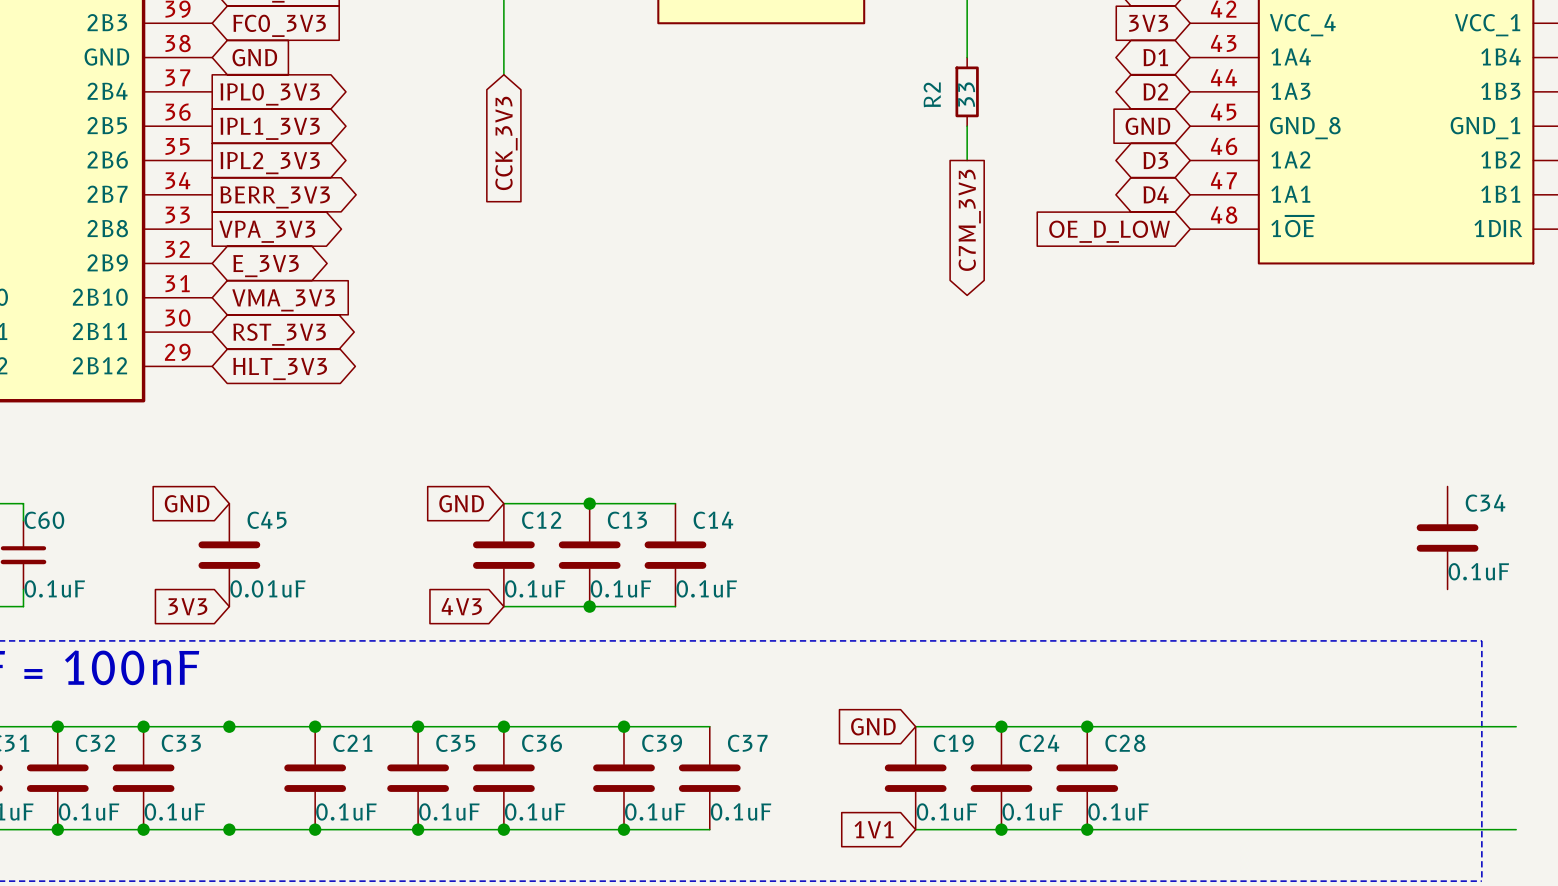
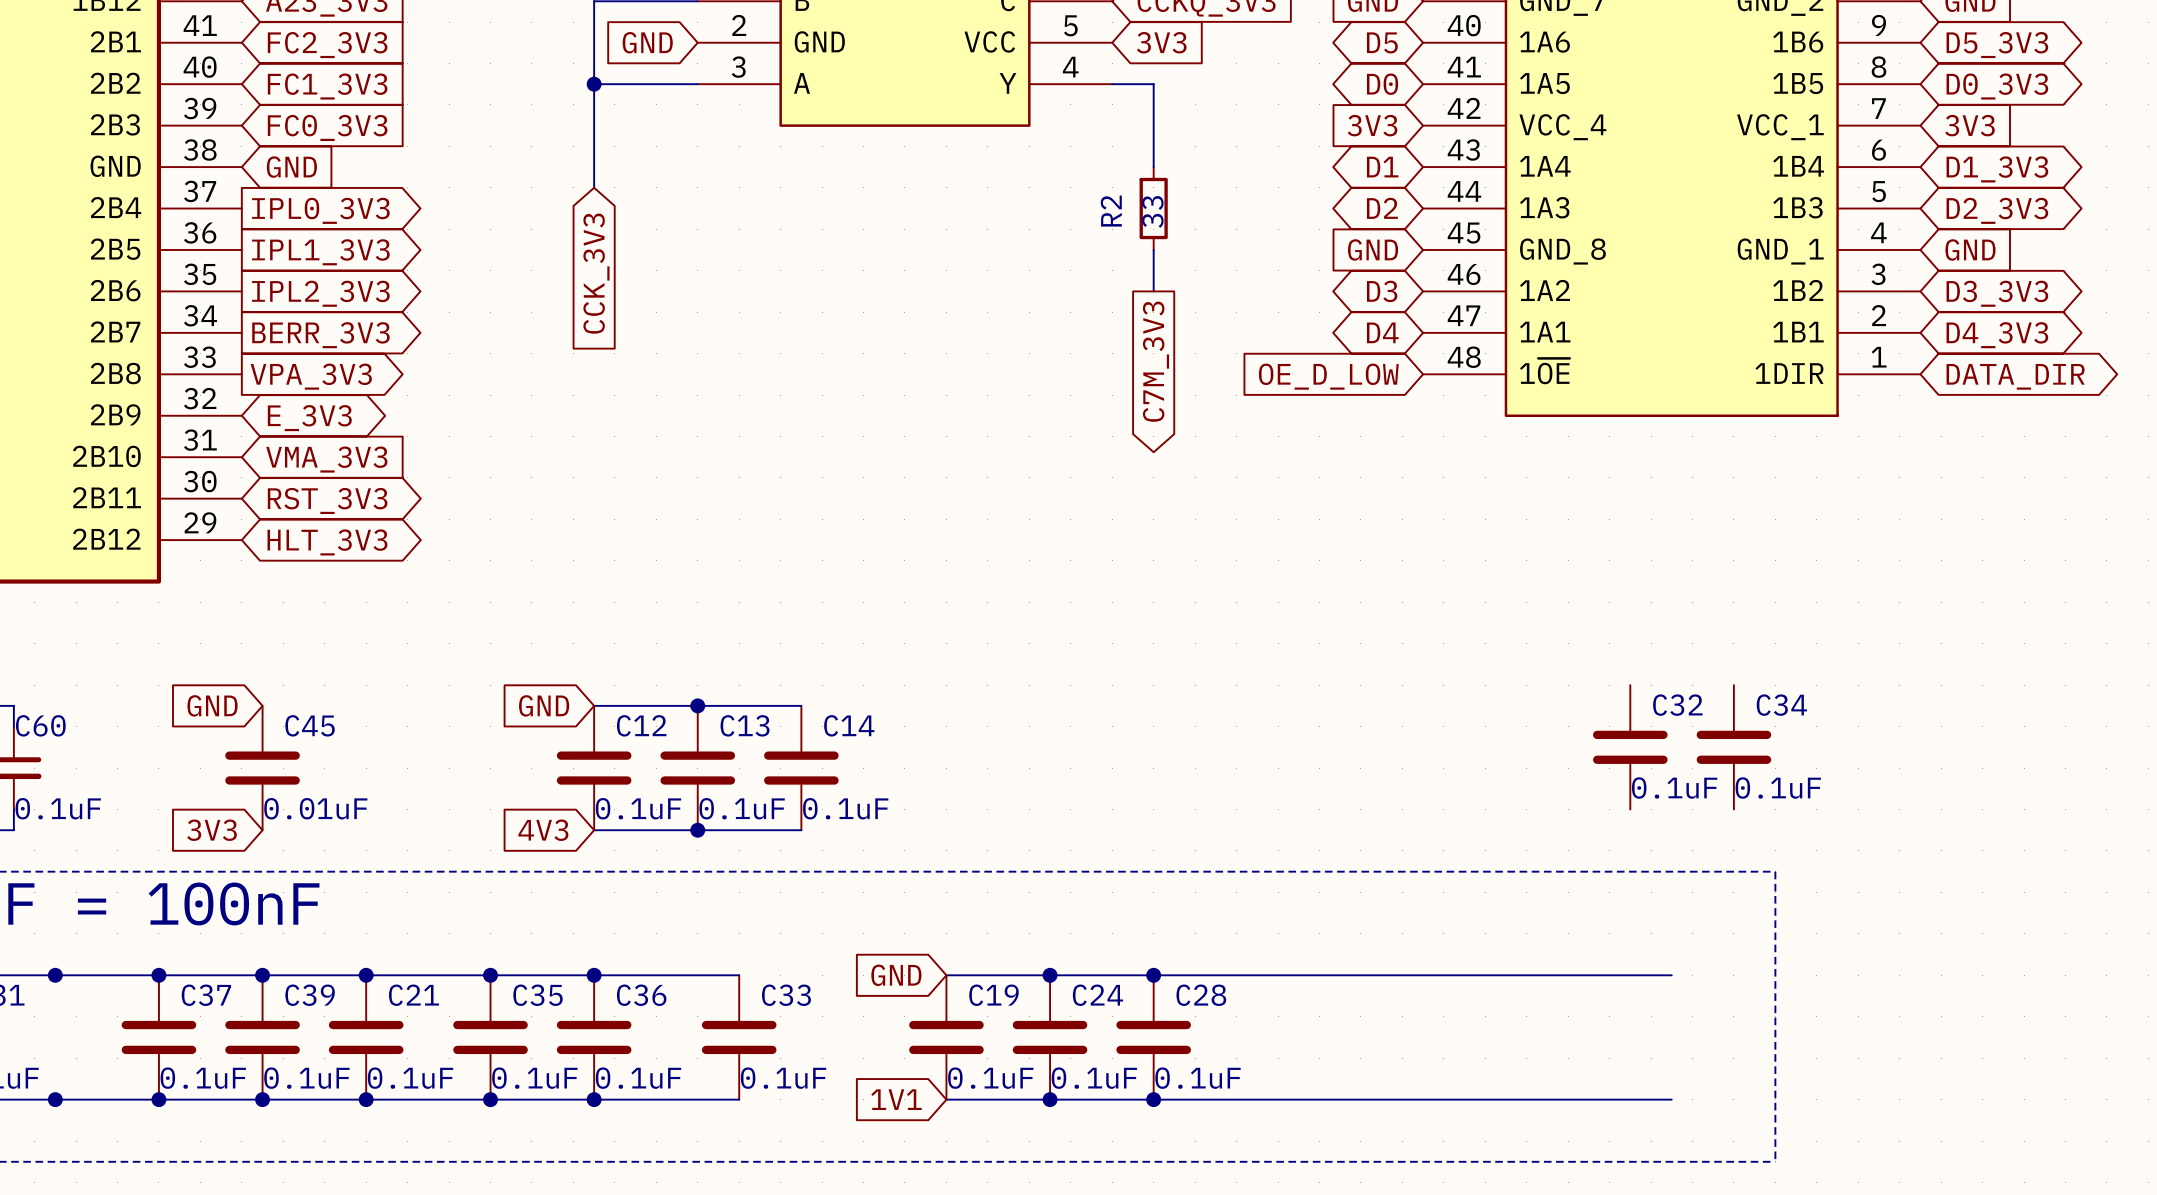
wire: (623, 726) (709, 726) -> none
junction: (623, 726) -> none
wire: none -> (946, 975) (1091, 975)
global label position: GND (873, 726) -> GND (896, 975)
junction: none -> (1050, 975)
junction position: (1001, 726) -> (1153, 975)
junction: (1087, 726) -> none
wire: (1396, 726) (1516, 726) -> none
C33 name: C33 (181, 743) -> C37 (206, 995)
C39 name: C39 (662, 743) -> C33 (786, 995)
C32 position: (57, 778) -> (1630, 747)
C39: none -> 0.1uF (262, 1037)
C37: 0.1uF (709, 778) -> none
C19 position: (915, 778) -> (946, 1037)
C24 position: (1001, 778) -> (1050, 1037)
C28 position: (1087, 778) -> (1153, 1037)
wire: (623, 829) (709, 829) -> none
junction: (623, 829) -> none
wire: none -> (946, 1099) (1091, 1099)
global label position: 1V1 (874, 829) -> 1V1 (896, 1099)
junction: none -> (1050, 1099)
junction position: (1001, 829) -> (1153, 1099)
junction: (1087, 829) -> none
wire: (1396, 829) (1516, 829) -> none

